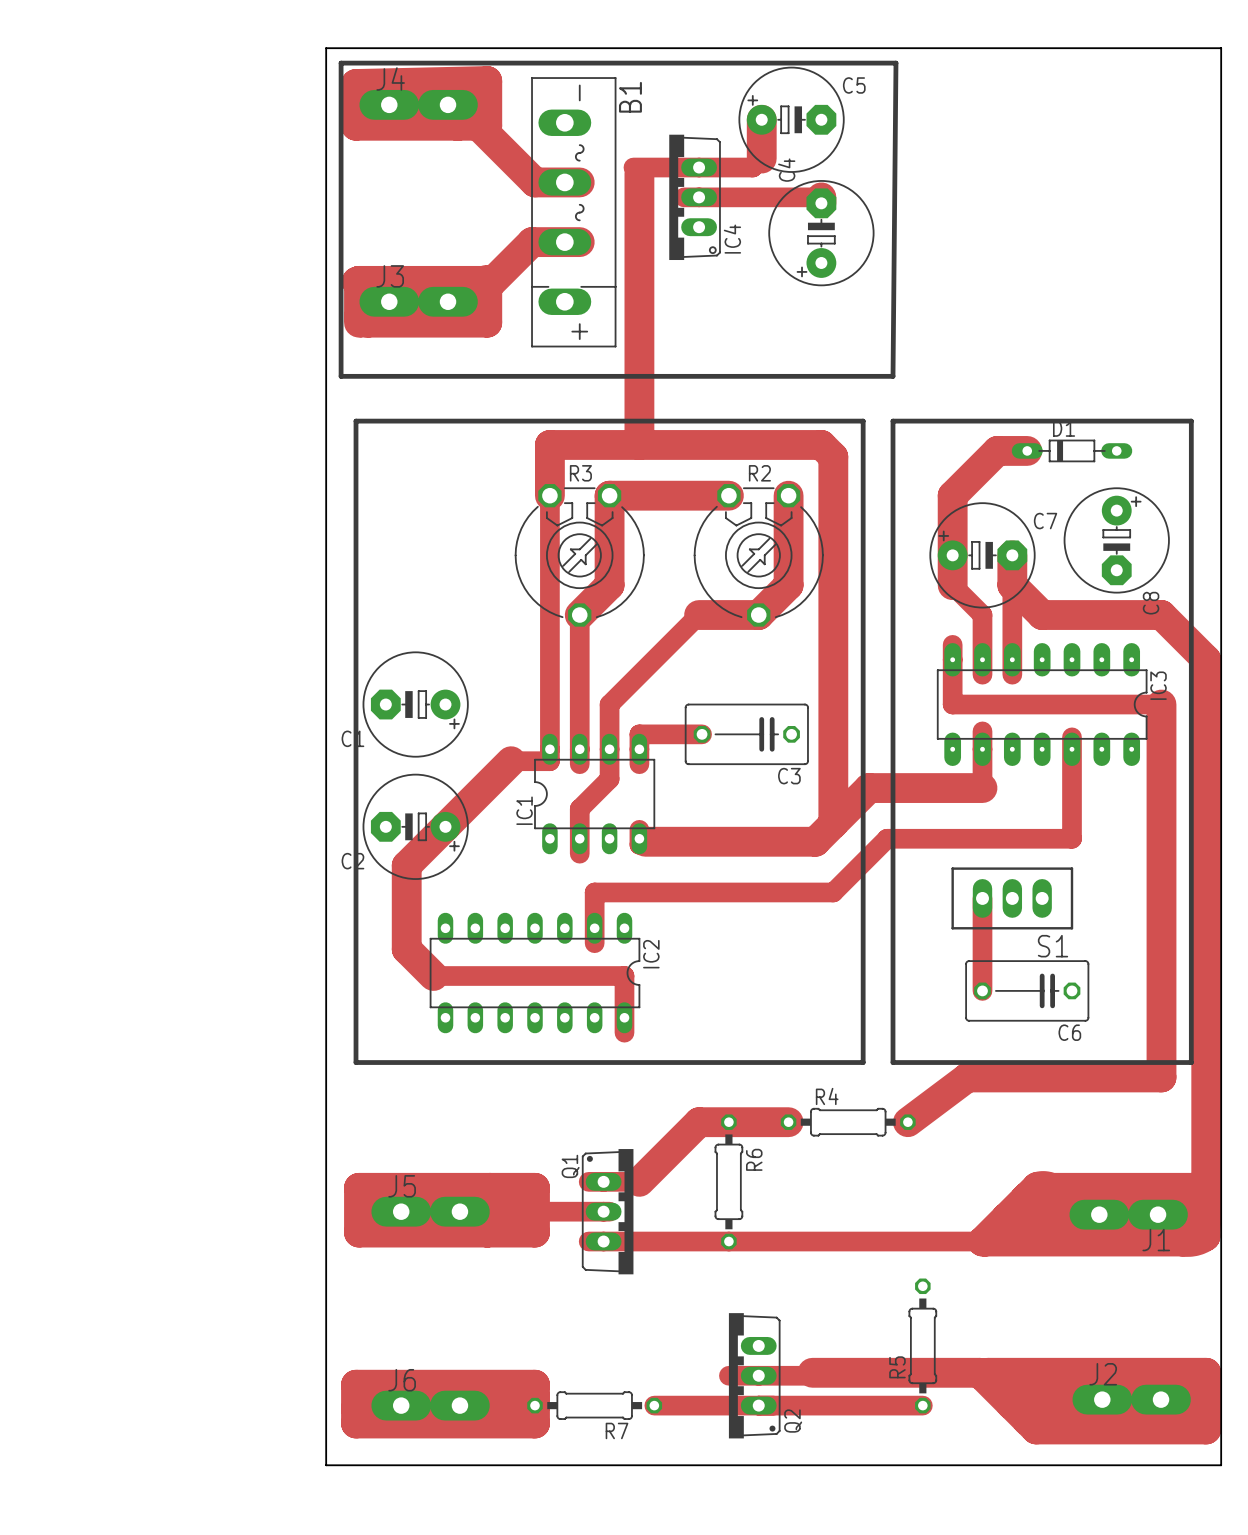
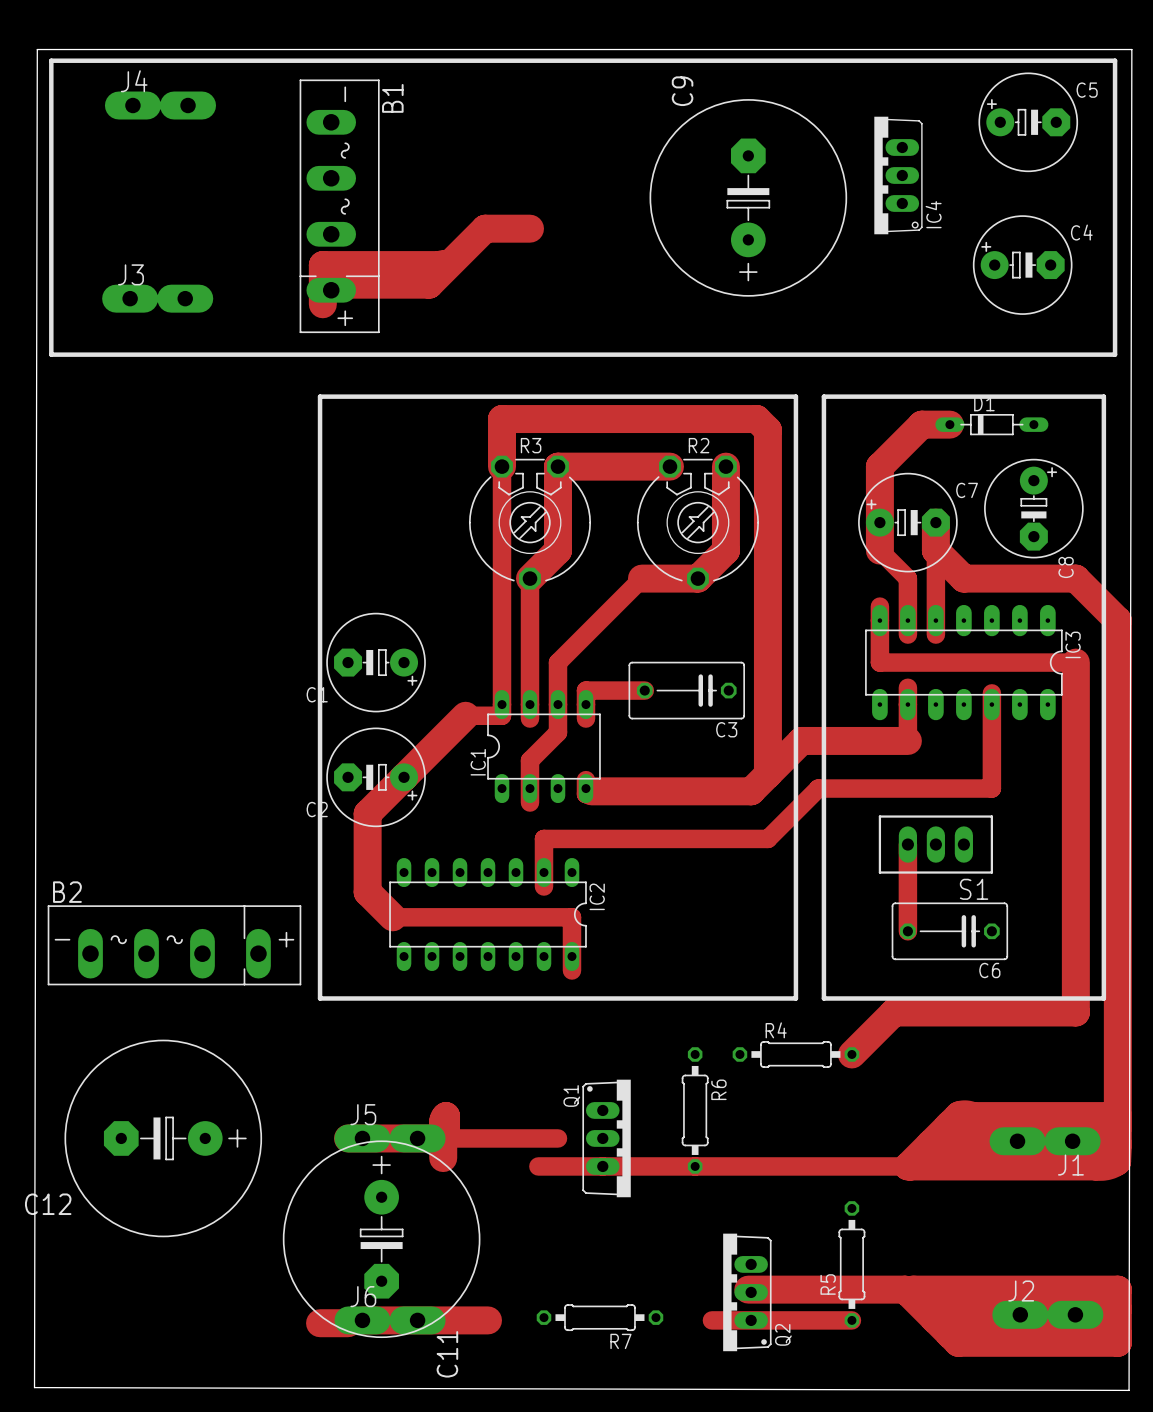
board edge: (326, 48) (1221, 48) (1221, 1465) (326, 1465) (326, 48) -> (37, 49) (34, 1387) (1129, 1390) (1131, 49) (37, 49)
line: (341, 63) (341, 376) -> (306, 60) (51, 60) (51, 354) (306, 354)
line: (895, 63) (893, 376) -> (826, 60) (1115, 60) (1115, 354) (823, 354)
track: (487, 81) (487, 125) (483, 127) (478, 125) (356, 125) (356, 83) (487, 81) -> none
J4 position: (418, 104) -> (160, 105)
track: (460, 107) (535, 182) (579, 182) -> none
track: (761, 119) (761, 158) (752, 167) (633, 167) -> none
C5 position: (791, 119) -> (1028, 122)
track: (639, 173) (639, 444) -> none
track: (684, 197) (821, 197) (821, 203) -> none
IC4 position: (694, 197) -> (898, 175)
C9: none -> (748, 197)
B1 position: (573, 212) -> (339, 206)
C4 rotation: 0° (821, 233) -> 90° clockwise (1022, 265)
C4 position: (821, 233) -> (1022, 265)
J3 position: (418, 301) -> (157, 298)
track: (472, 301) (487, 289) (487, 322) (368, 322) (358, 316) -> none
B2: none -> (174, 945)
track: (967, 1077) (907, 1122) -> (893, 1012) (851, 1054)
track: (788, 1122) (699, 1122) (639, 1181) (588, 1181) -> none
R4 position: (848, 1122) -> (795, 1054)
R6 position: (728, 1181) -> (695, 1110)
track: (358, 1187) (535, 1187) (535, 1232) (358, 1232) (358, 1187) -> none
C12: none -> (163, 1138)
Q1 position: (607, 1211) -> (606, 1138)
C11: none -> (381, 1239)
track: (728, 1375) (815, 1375) -> none
Q2 position: (754, 1375) -> (747, 1292)
track: (356, 1384) (535, 1384) (535, 1423) (356, 1423) (356, 1384) -> none
R7 position: (594, 1405) -> (599, 1317)
track: (654, 1405) (773, 1405) -> none

